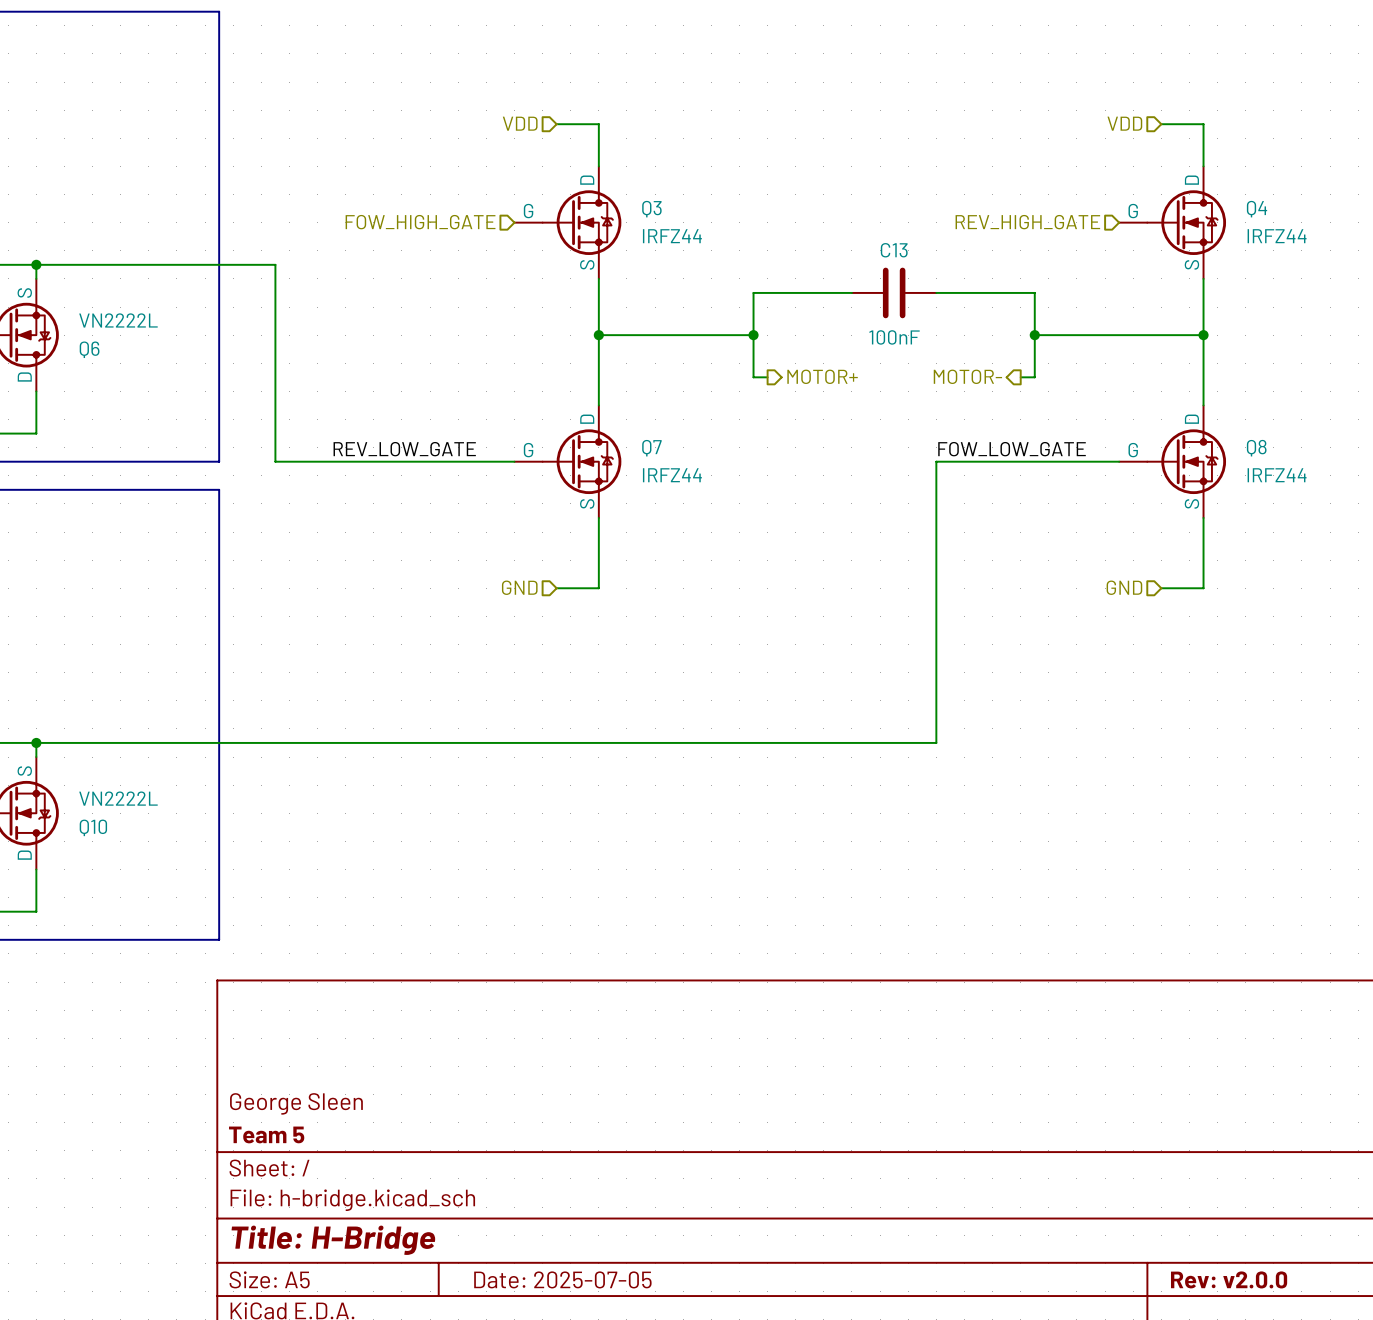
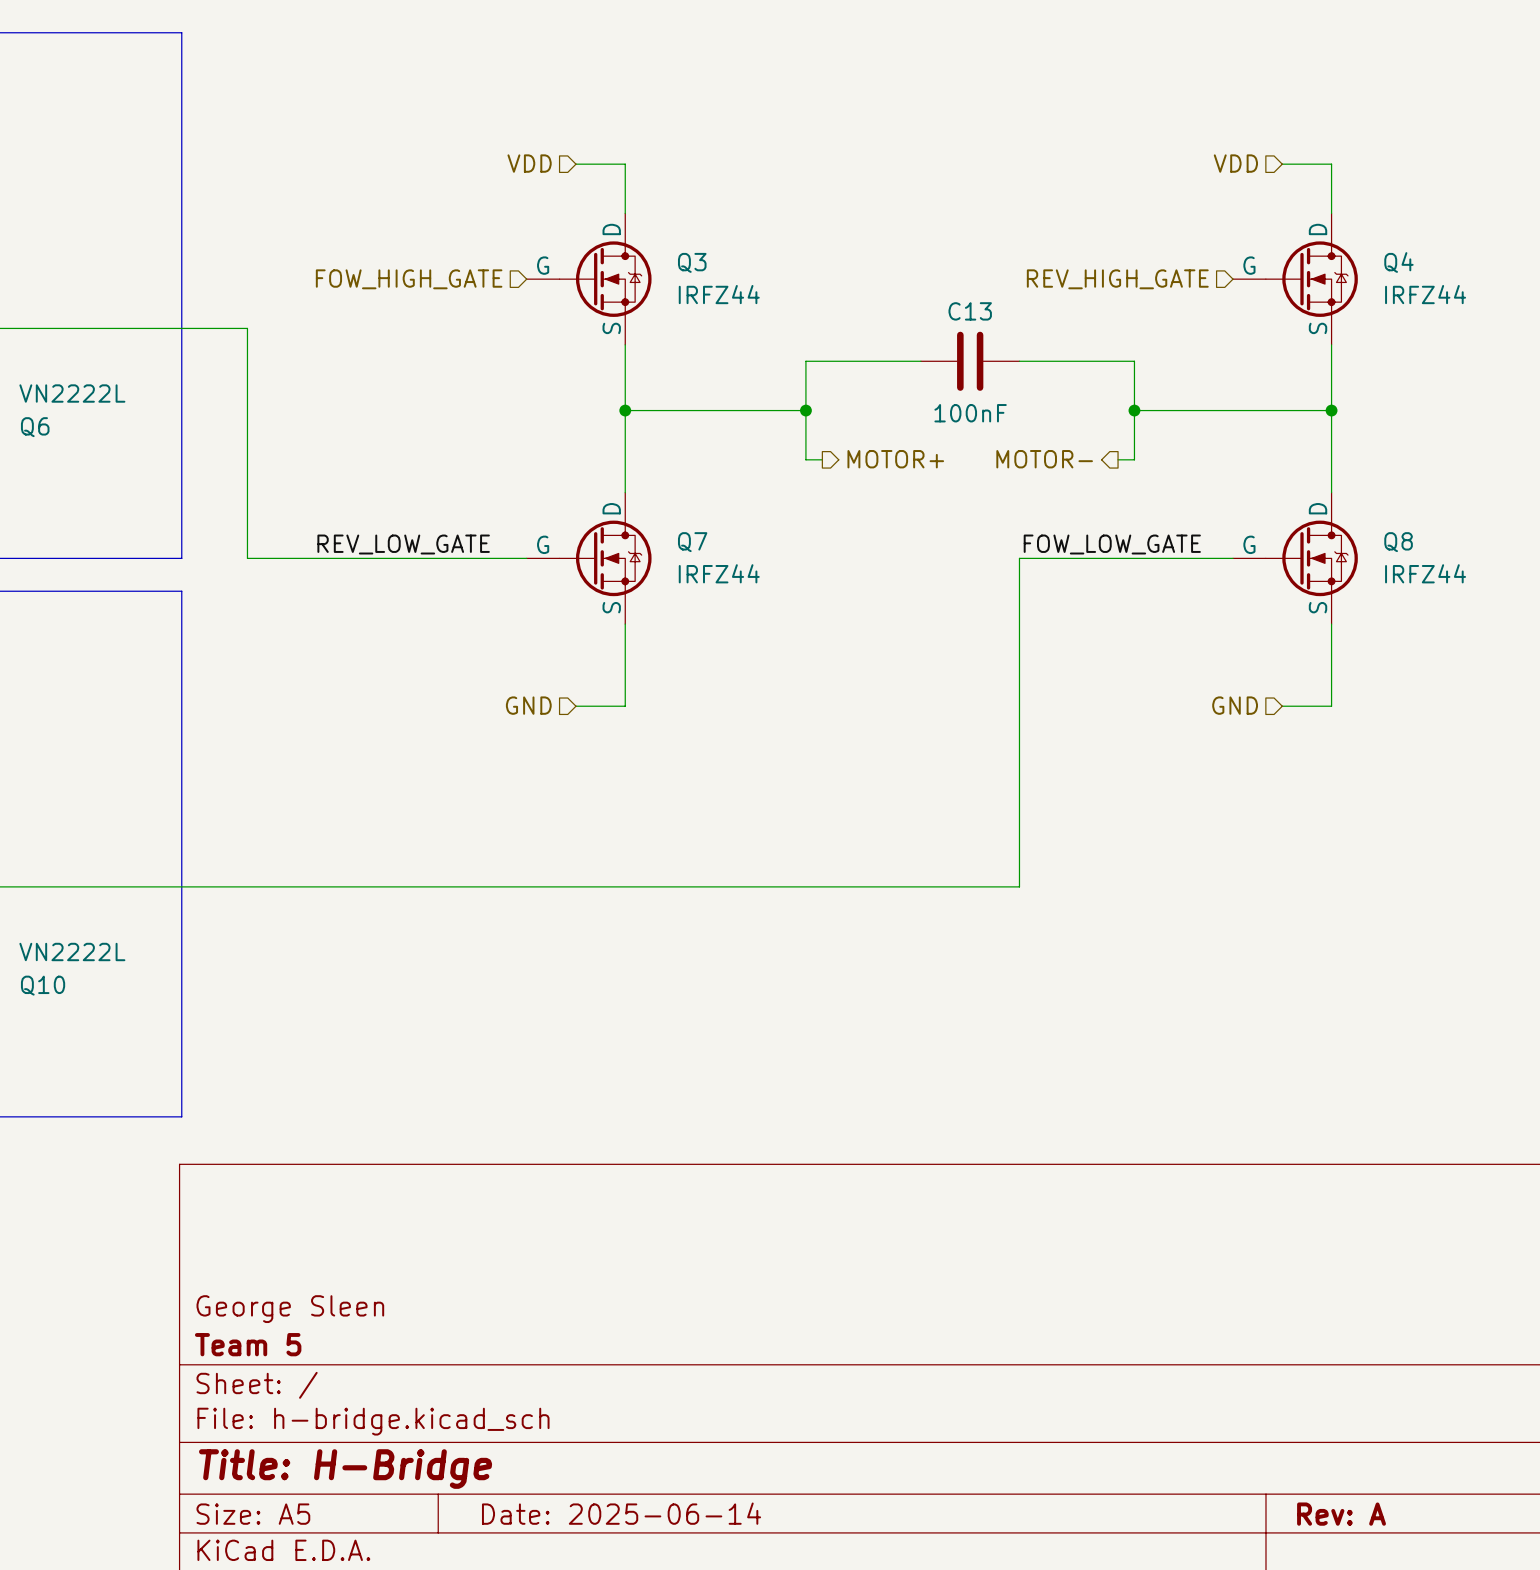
title block: Date: 2025-07-05 (562, 1279) -> Date: 2025-06-14 (621, 1513)
title block: Rev: v2.0.0 (1229, 1279) -> Rev: A (1341, 1514)

